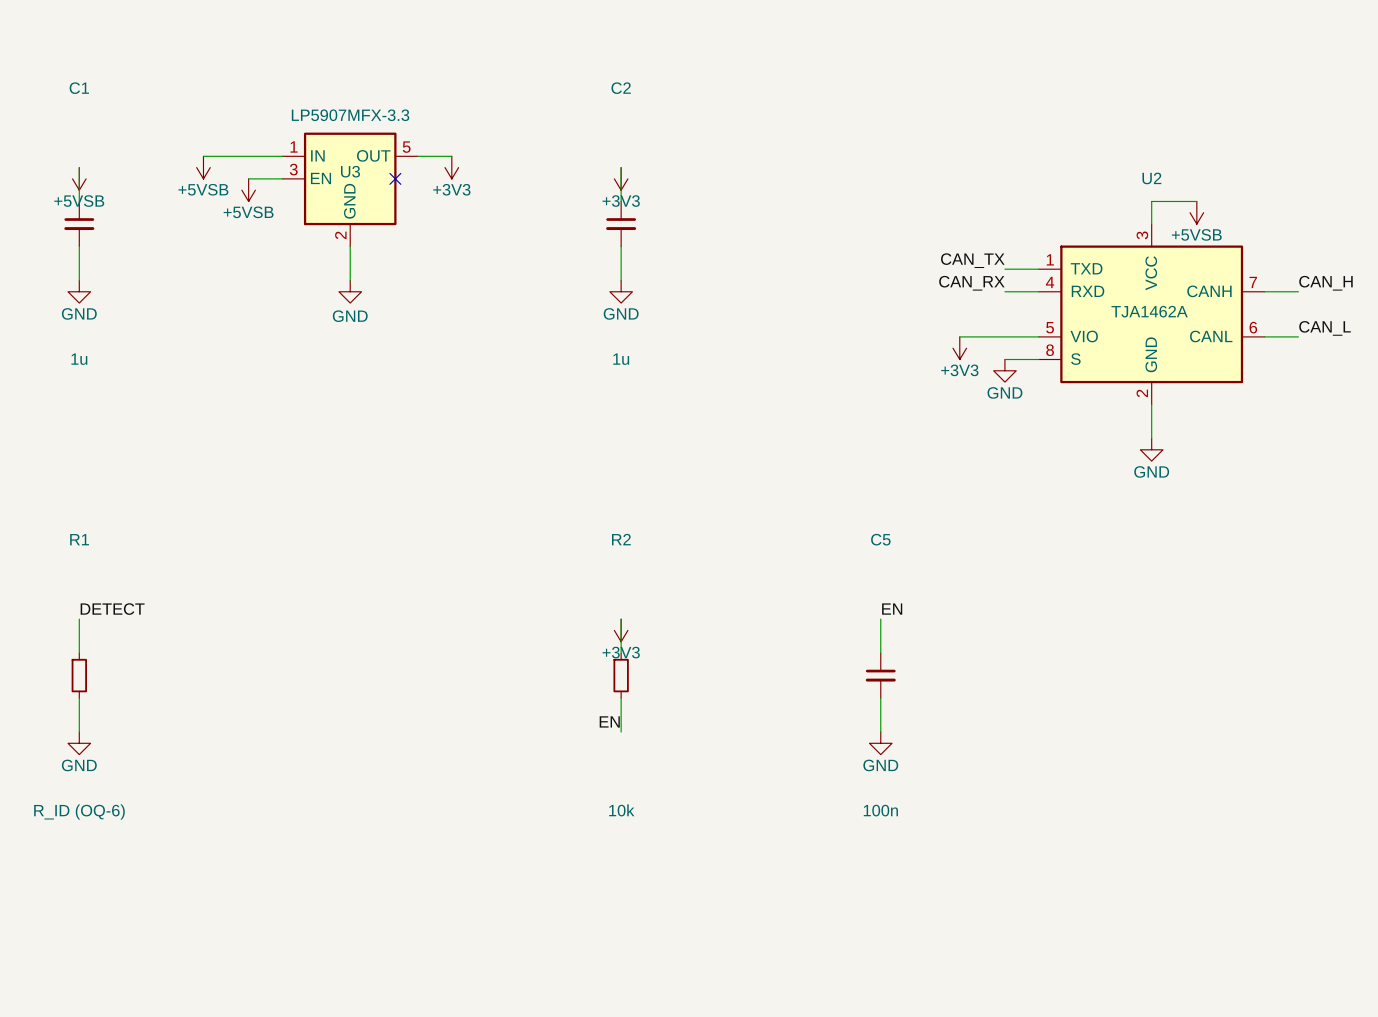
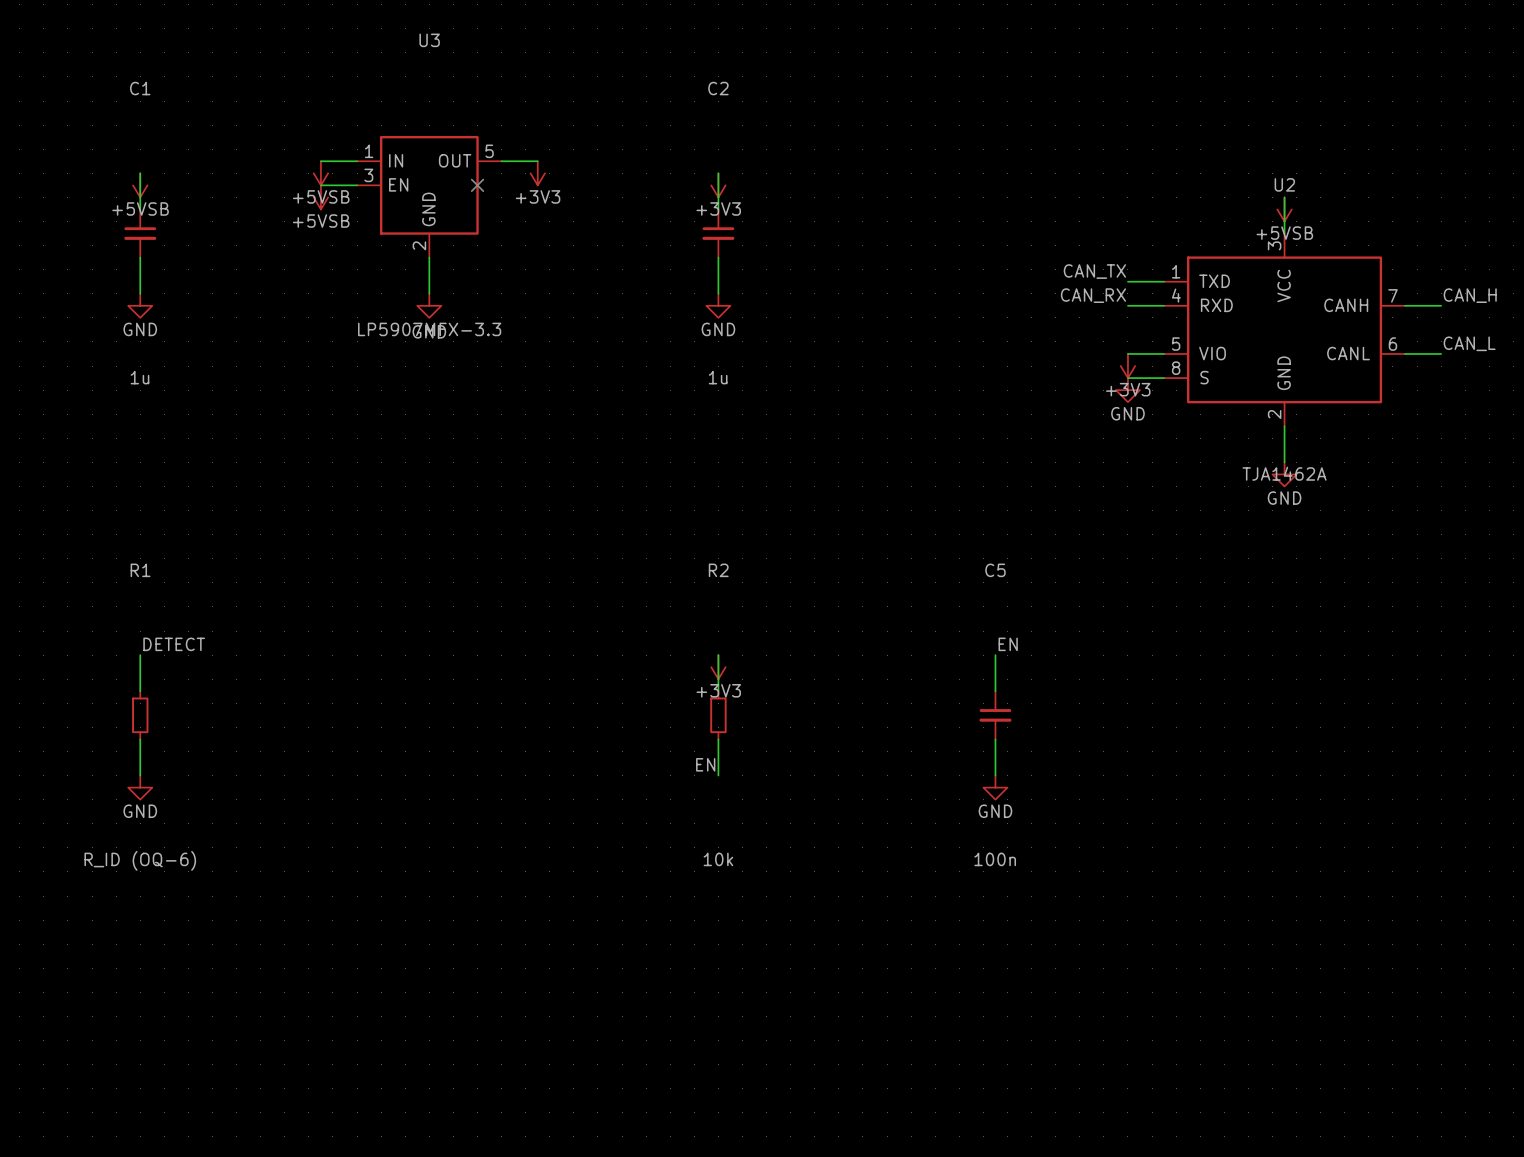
U3 value position: LP5907MFX-3.3 (350, 115) -> LP5907MFX-3.3 (429, 329)
wire: (203, 156) (248, 156) -> none
power symbol position: +5VSB (203, 167) -> +5VSB (320, 173)
U3 name position: U3 (350, 171) -> U3 (429, 40)
wire: (1151, 201) (1196, 201) -> (1284, 209) (1284, 197)
power symbol position: +5VSB (1196, 212) -> +5VSB (1284, 209)
U2 value position: TJA1462A (1149, 311) -> TJA1462A (1284, 473)
wire: (959, 336) (1004, 336) -> none
power symbol position: +3V3 (959, 348) -> +3V3 (1127, 366)

